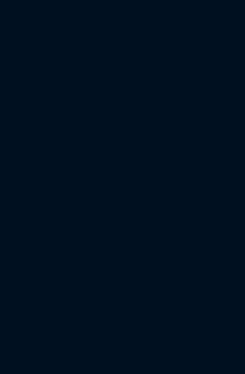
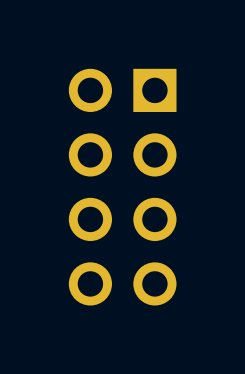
part: none -> (122, 187)

